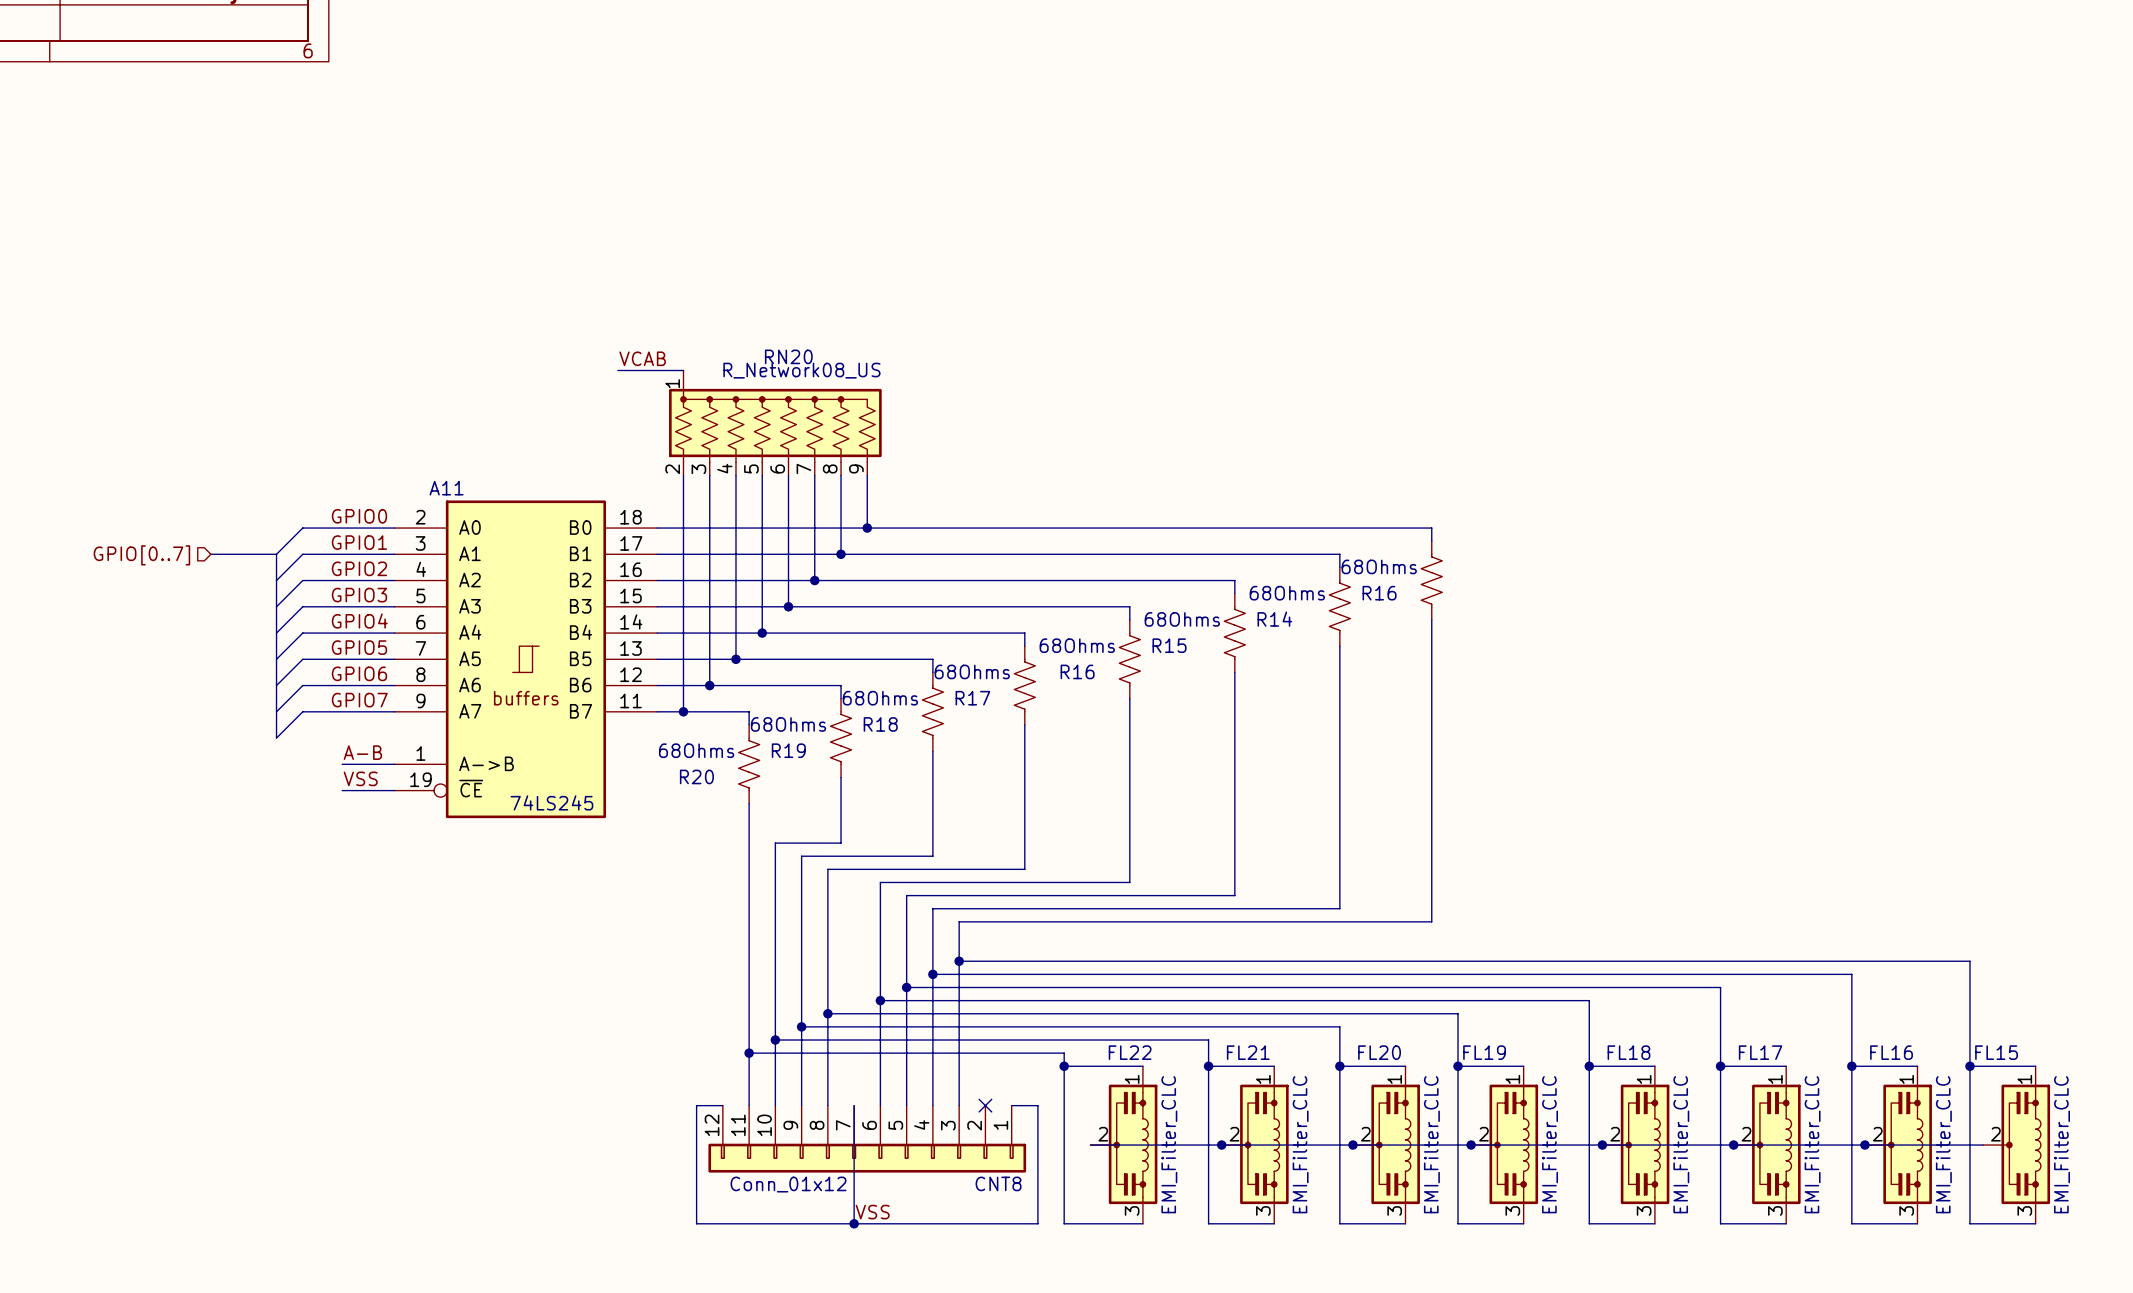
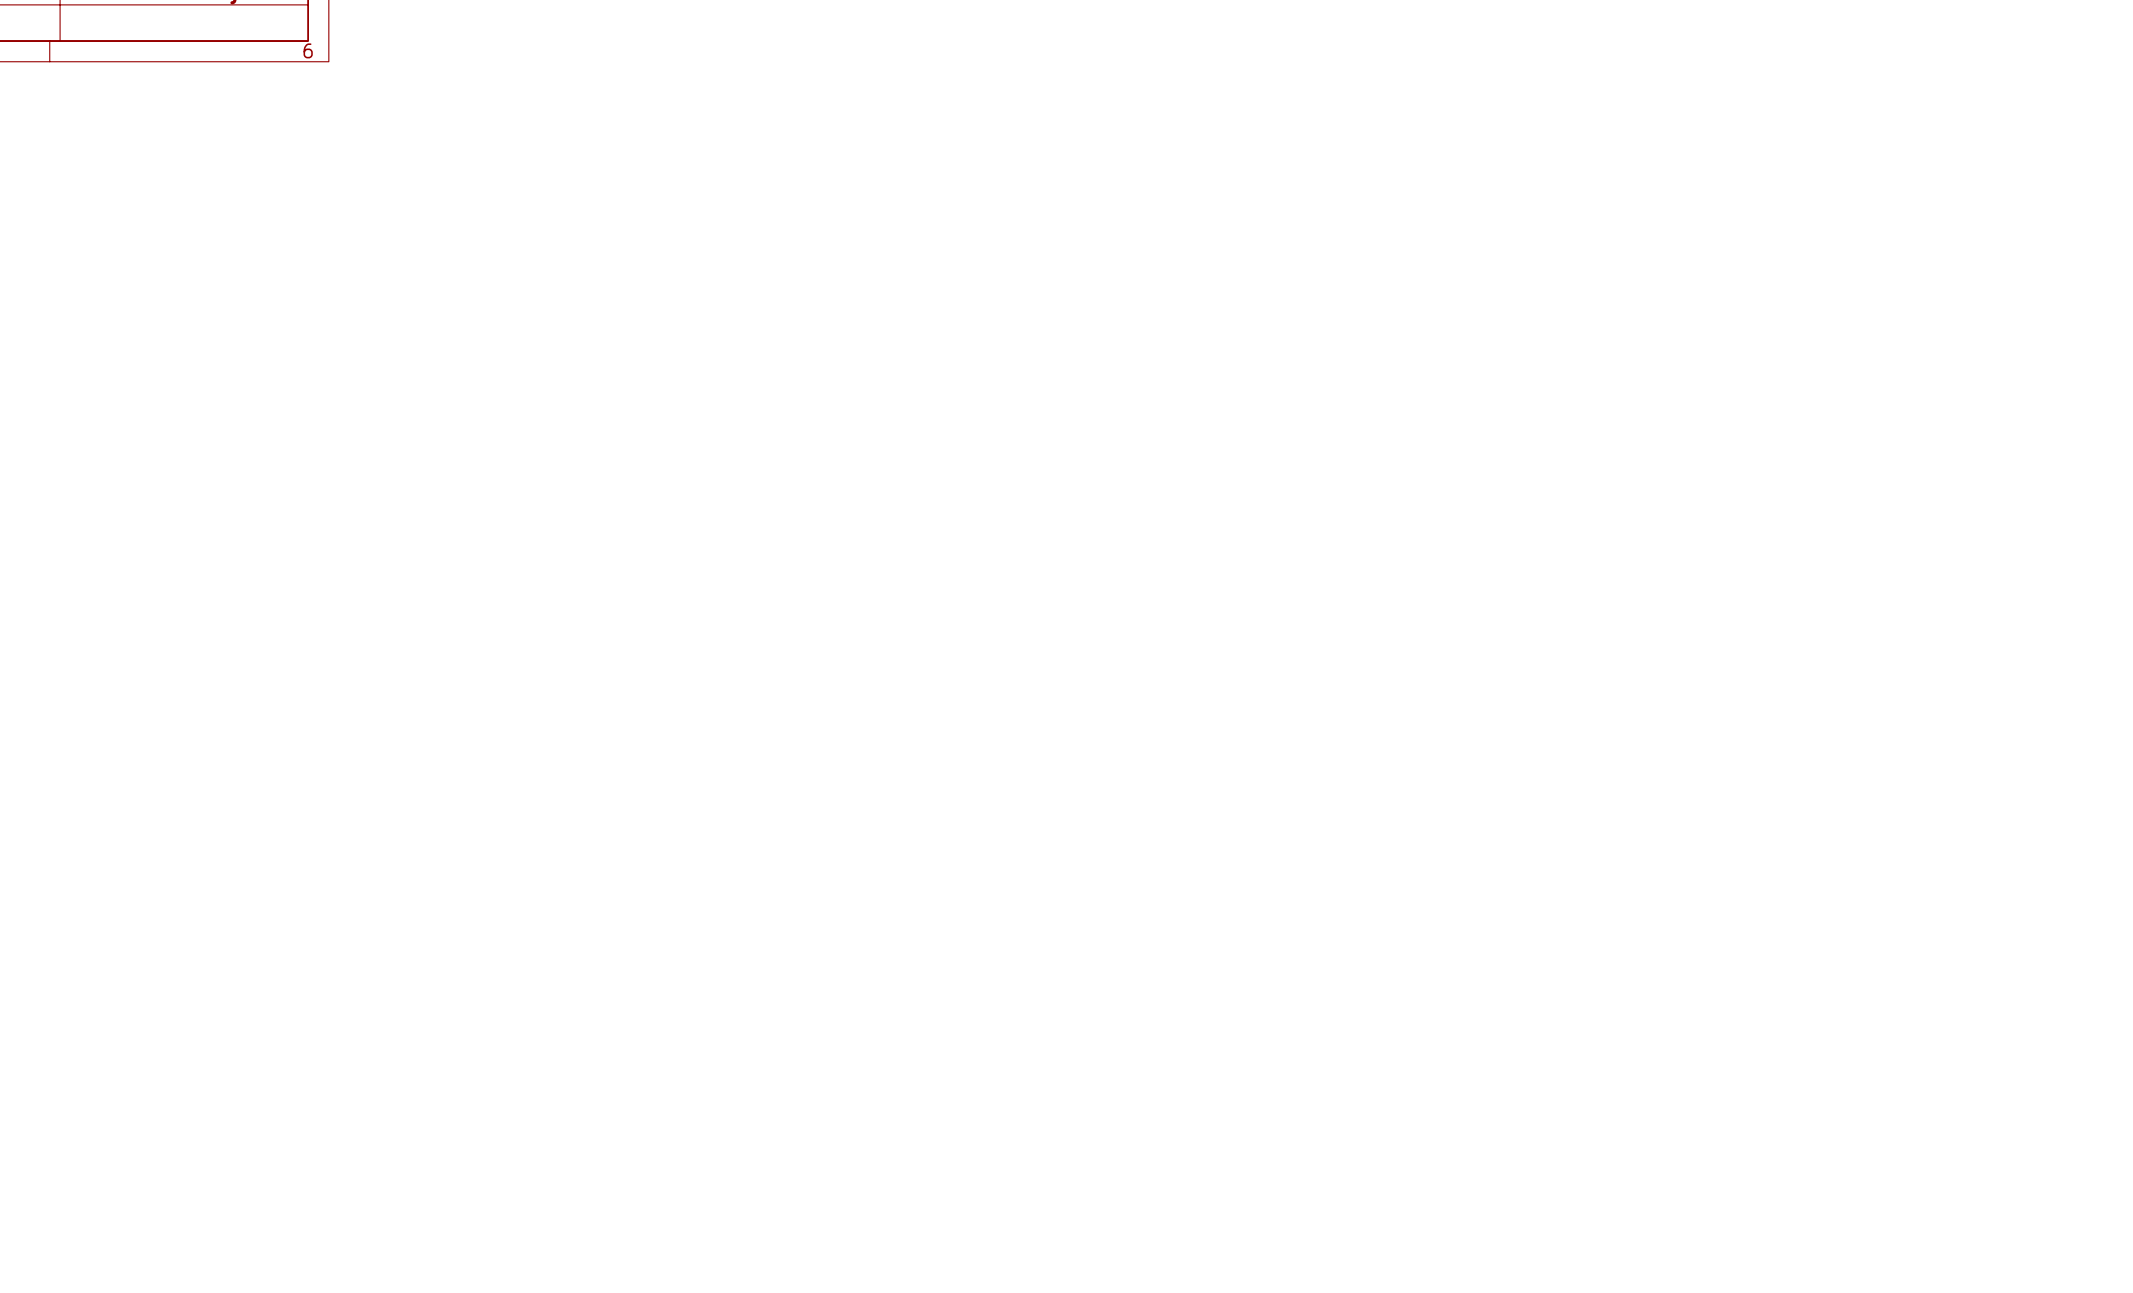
label: VCAB (642, 358) -> none
wire: (617, 370) (683, 370) -> none
RN20: R_Network08_US (775, 423) -> none
wire: (683, 475) (683, 711) -> none
wire: (709, 475) (709, 685) -> none
wire: (735, 475) (735, 659) -> none
wire: (762, 475) (762, 633) -> none
wire: (788, 475) (788, 606) -> none
wire: (814, 475) (814, 580) -> none
wire: (841, 475) (841, 554) -> none
wire: (867, 475) (867, 528) -> none
label: GPIO0 (359, 516) -> none
wire: (394, 528) (302, 528) (276, 554) -> none
wire: (657, 528) (1431, 528) (1431, 541) -> none
junction: (867, 528) -> none
label: GPIO1 (359, 542) -> none
bus: (210, 554) (276, 554) (276, 738) -> none
wire: (394, 554) (302, 554) (276, 580) -> none
wire: (657, 554) (1339, 554) (1339, 567) -> none
junction: (841, 554) -> none
hierarchical label: GPIO[0..7] (141, 555) -> none
label: GPIO2 (359, 568) -> none
wire: (394, 580) (302, 580) (276, 606) -> none
wire: (657, 580) (1234, 580) (1234, 593) -> none
junction: (814, 580) -> none
R16: 68Ohms (1431, 580) -> none
label: GPIO3 (359, 595) -> none
wire: (394, 606) (302, 606) (276, 633) -> none
wire: (657, 606) (1129, 606) (1129, 619) -> none
junction: (788, 606) -> none
R14: 68Ohms (1339, 606) -> none
wire: (1431, 619) (1431, 921) (959, 921) (959, 1105) -> none
label: GPIO4 (359, 621) -> none
wire: (394, 633) (302, 633) (276, 659) -> none
wire: (657, 633) (1024, 633) (1024, 646) -> none
junction: (762, 633) -> none
R15: 68Ohms (1234, 633) -> none
wire: (1339, 646) (1339, 908) (932, 908) (932, 1105) -> none
label: GPIO5 (359, 647) -> none
wire: (394, 659) (302, 659) (276, 685) -> none
A11: 74LS245 (525, 659) -> none
wire: (657, 659) (932, 659) (932, 672) -> none
junction: (735, 659) -> none
R16: 68Ohms (1129, 659) -> none
wire: (1234, 672) (1234, 895) (906, 895) (906, 1105) -> none
label: GPIO6 (359, 673) -> none
wire: (394, 685) (302, 685) (276, 711) -> none
wire: (657, 685) (841, 685) (841, 698) -> none
junction: (709, 685) -> none
R17: 68Ohms (1024, 685) -> none
wire: (1129, 698) (1129, 882) (880, 882) (880, 1105) -> none
label: GPIO7 (359, 700) -> none
wire: (394, 711) (302, 711) (276, 738) -> none
wire: (657, 711) (749, 711) (749, 724) -> none
junction: (683, 711) -> none
R18: 68Ohms (932, 711) -> none
wire: (1024, 724) (1024, 869) (827, 869) (827, 1105) -> none
R19: 68Ohms (841, 738) -> none
wire: (932, 751) (932, 856) (801, 856) (801, 1105) -> none
label: A-B (362, 752) -> none
wire: (342, 764) (394, 764) -> none
R20: 68Ohms (749, 764) -> none
wire: (841, 777) (841, 843) (775, 843) (775, 1105) -> none
label: VSS (360, 778) -> none
wire: (342, 790) (394, 790) -> none
wire: (749, 803) (749, 1105) -> none
wire: (959, 961) (1969, 961) (1969, 1223) (2035, 1223) -> none
junction: (959, 961) -> none
wire: (932, 974) (1851, 974) (1851, 1223) (1917, 1223) -> none
junction: (932, 974) -> none
wire: (906, 987) (1720, 987) (1720, 1223) (1786, 1223) -> none
junction: (906, 987) -> none
wire: (880, 1000) (1589, 1000) (1589, 1223) (1654, 1223) -> none
junction: (880, 1000) -> none
wire: (827, 1013) (1458, 1013) (1458, 1223) (1523, 1223) -> none
junction: (827, 1013) -> none
wire: (801, 1026) (1339, 1026) (1339, 1223) (1405, 1223) -> none
junction: (801, 1026) -> none
wire: (775, 1040) (1208, 1040) (1208, 1223) (1274, 1223) -> none
junction: (775, 1040) -> none
wire: (749, 1053) (1064, 1053) (1064, 1223) (1142, 1223) -> none
junction: (749, 1053) -> none
wire: (1064, 1066) (1142, 1066) -> none
junction: (1064, 1066) -> none
wire: (1208, 1066) (1274, 1066) -> none
junction: (1208, 1066) -> none
wire: (1339, 1066) (1405, 1066) -> none
junction: (1339, 1066) -> none
wire: (1458, 1066) (1523, 1066) -> none
junction: (1458, 1066) -> none
wire: (1589, 1066) (1654, 1066) -> none
junction: (1589, 1066) -> none
wire: (1720, 1066) (1786, 1066) -> none
junction: (1720, 1066) -> none
wire: (1851, 1066) (1917, 1066) -> none
junction: (1851, 1066) -> none
wire: (1969, 1066) (2035, 1066) -> none
junction: (1969, 1066) -> none
wire: (722, 1105) (696, 1105) (696, 1223) (1037, 1223) (1037, 1105) (1011, 1105) -> none
wire: (854, 1105) (854, 1223) -> none
no-connect mark: (985, 1105) -> none
CNT8: Conn_01x12 (867, 1139) -> none
wire: (1090, 1145) (1983, 1145) -> none
FL22: EMI_Filter_CLC (1123, 1145) -> none
junction: (1221, 1145) -> none
FL21: EMI_Filter_CLC (1255, 1145) -> none
junction: (1352, 1145) -> none
FL20: EMI_Filter_CLC (1386, 1145) -> none
junction: (1471, 1145) -> none
FL19: EMI_Filter_CLC (1504, 1145) -> none
junction: (1602, 1145) -> none
FL18: EMI_Filter_CLC (1635, 1145) -> none
junction: (1733, 1145) -> none
FL17: EMI_Filter_CLC (1767, 1145) -> none
junction: (1864, 1145) -> none
FL16: EMI_Filter_CLC (1898, 1145) -> none
FL15: EMI_Filter_CLC (2016, 1145) -> none
label: VSS (872, 1212) -> none
junction: (854, 1223) -> none

